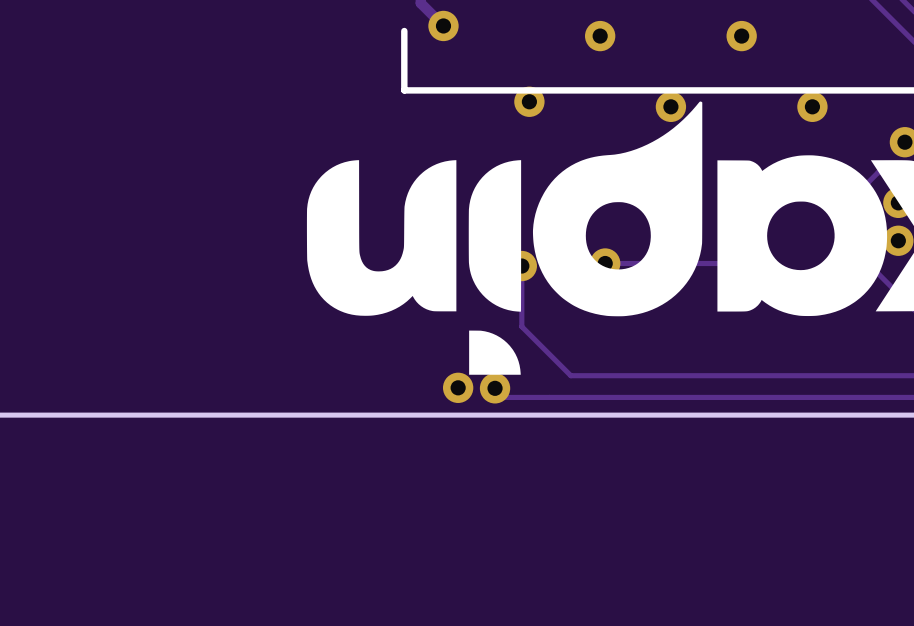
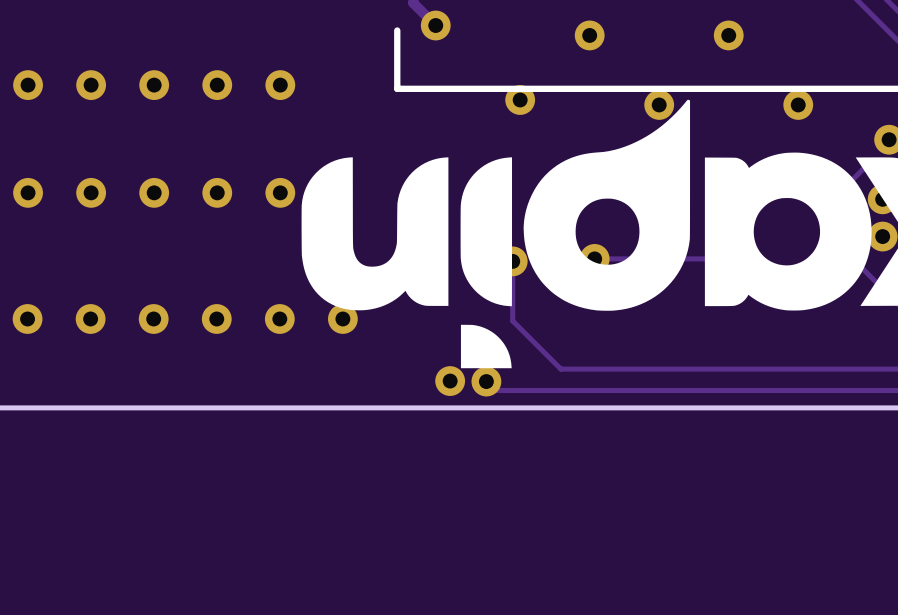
via: none -> (28, 85)
via: none -> (91, 85)
via: none -> (154, 85)
via: none -> (217, 85)
via: none -> (280, 85)
via: none -> (28, 192)
via: none -> (91, 192)
via: none -> (154, 192)
via: none -> (217, 192)
via: none -> (280, 192)
via: none -> (27, 318)
via: none -> (90, 318)
via: none -> (153, 318)
via: none -> (216, 318)
via: none -> (279, 318)
via: none -> (342, 318)

